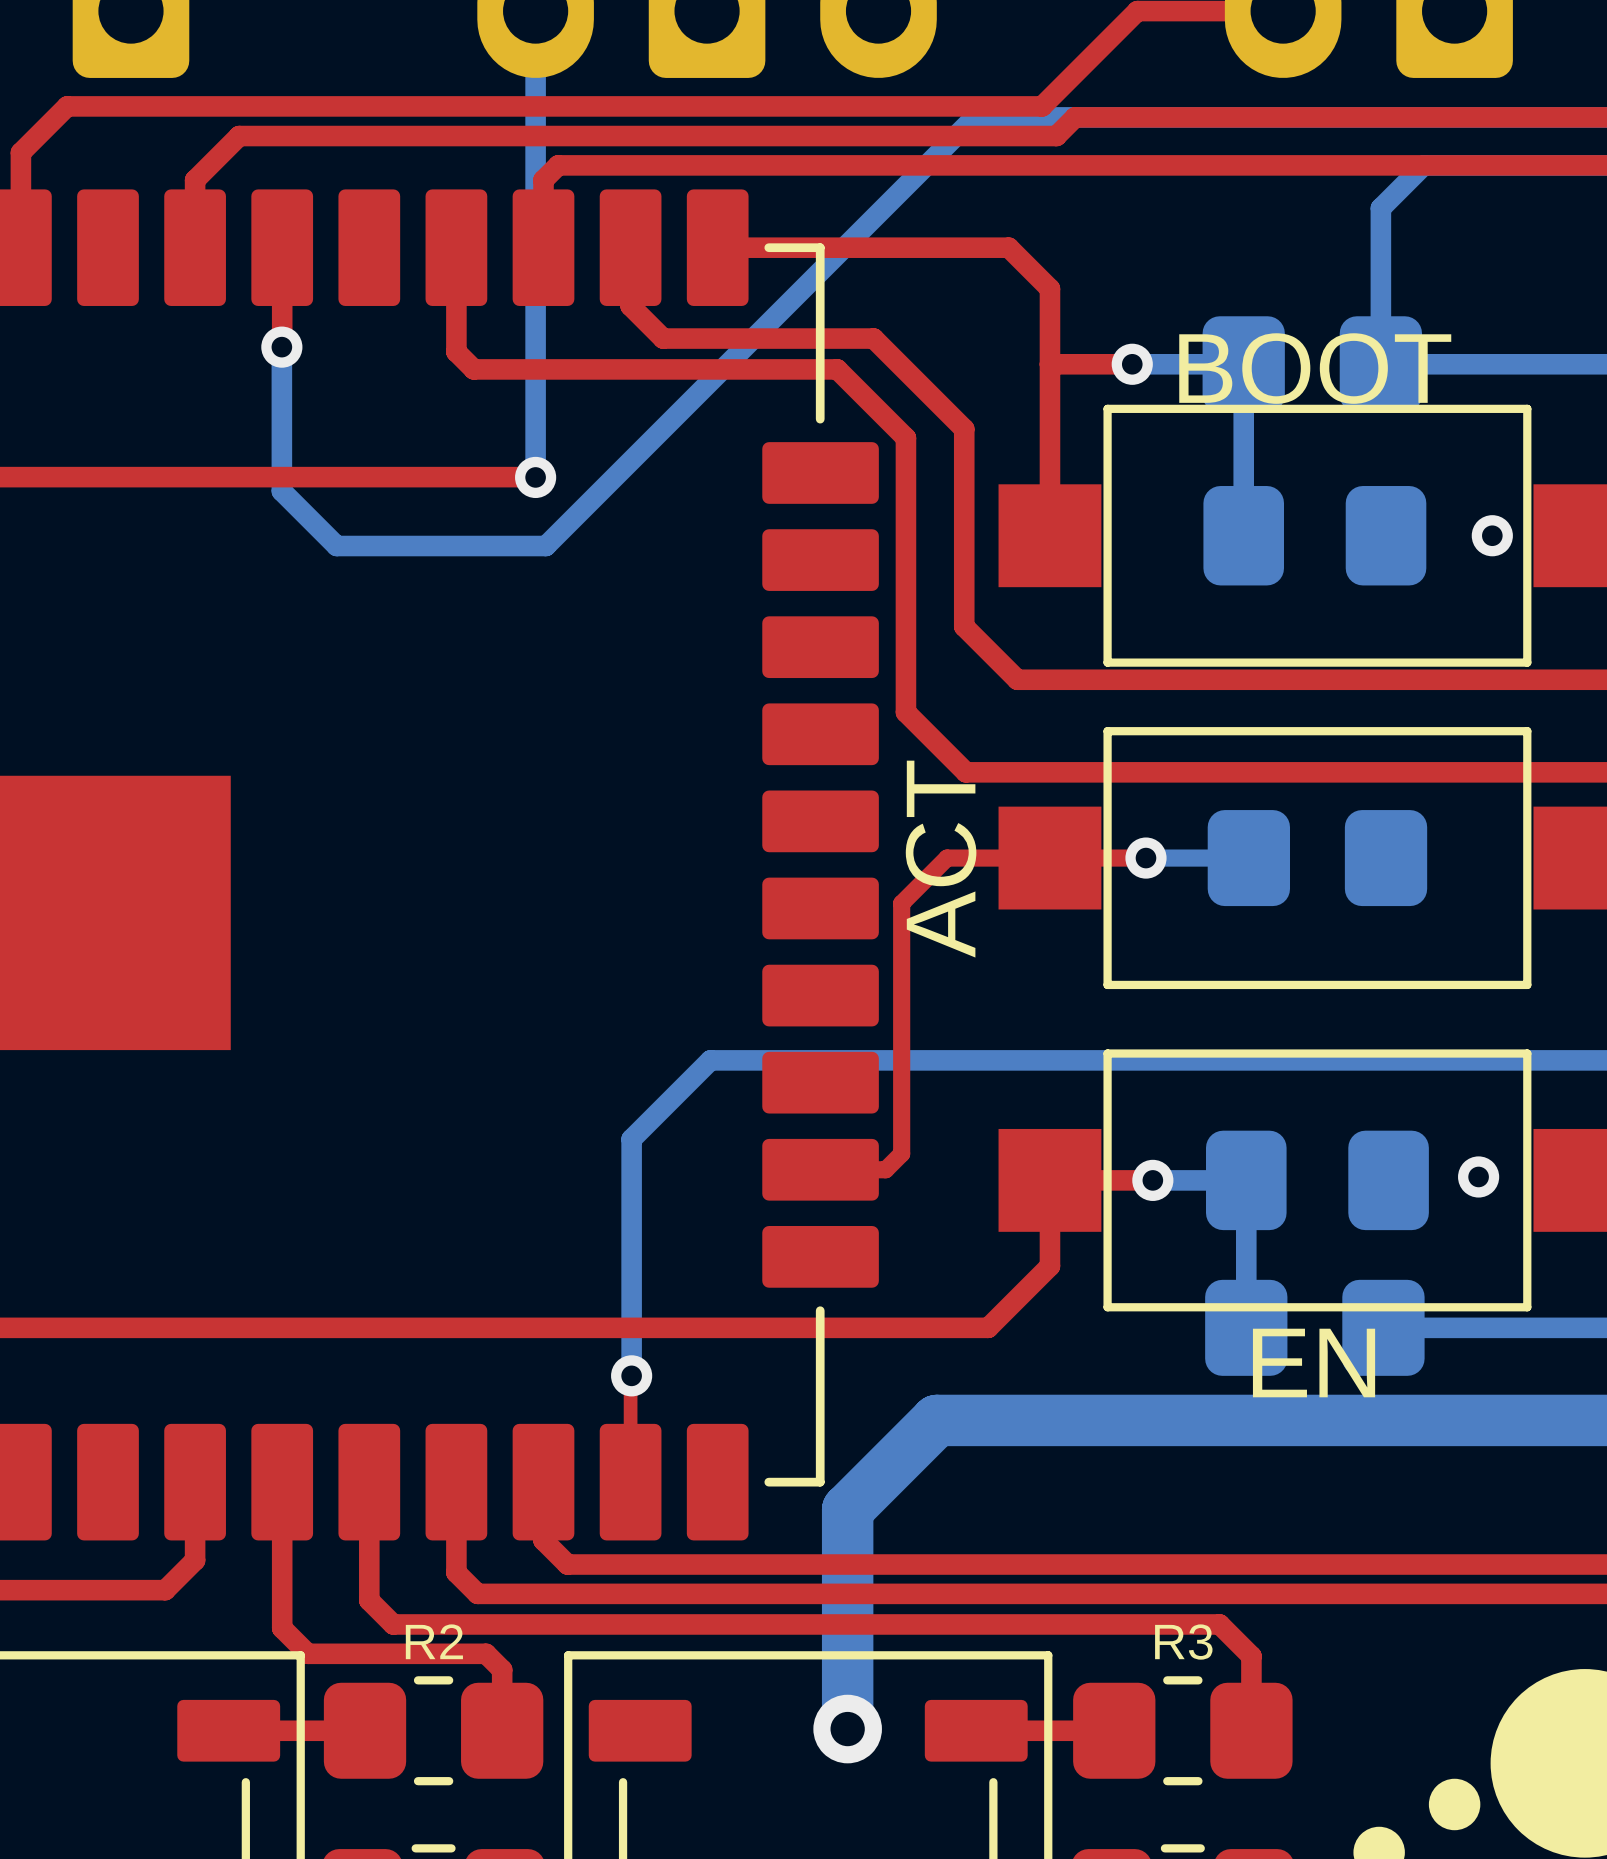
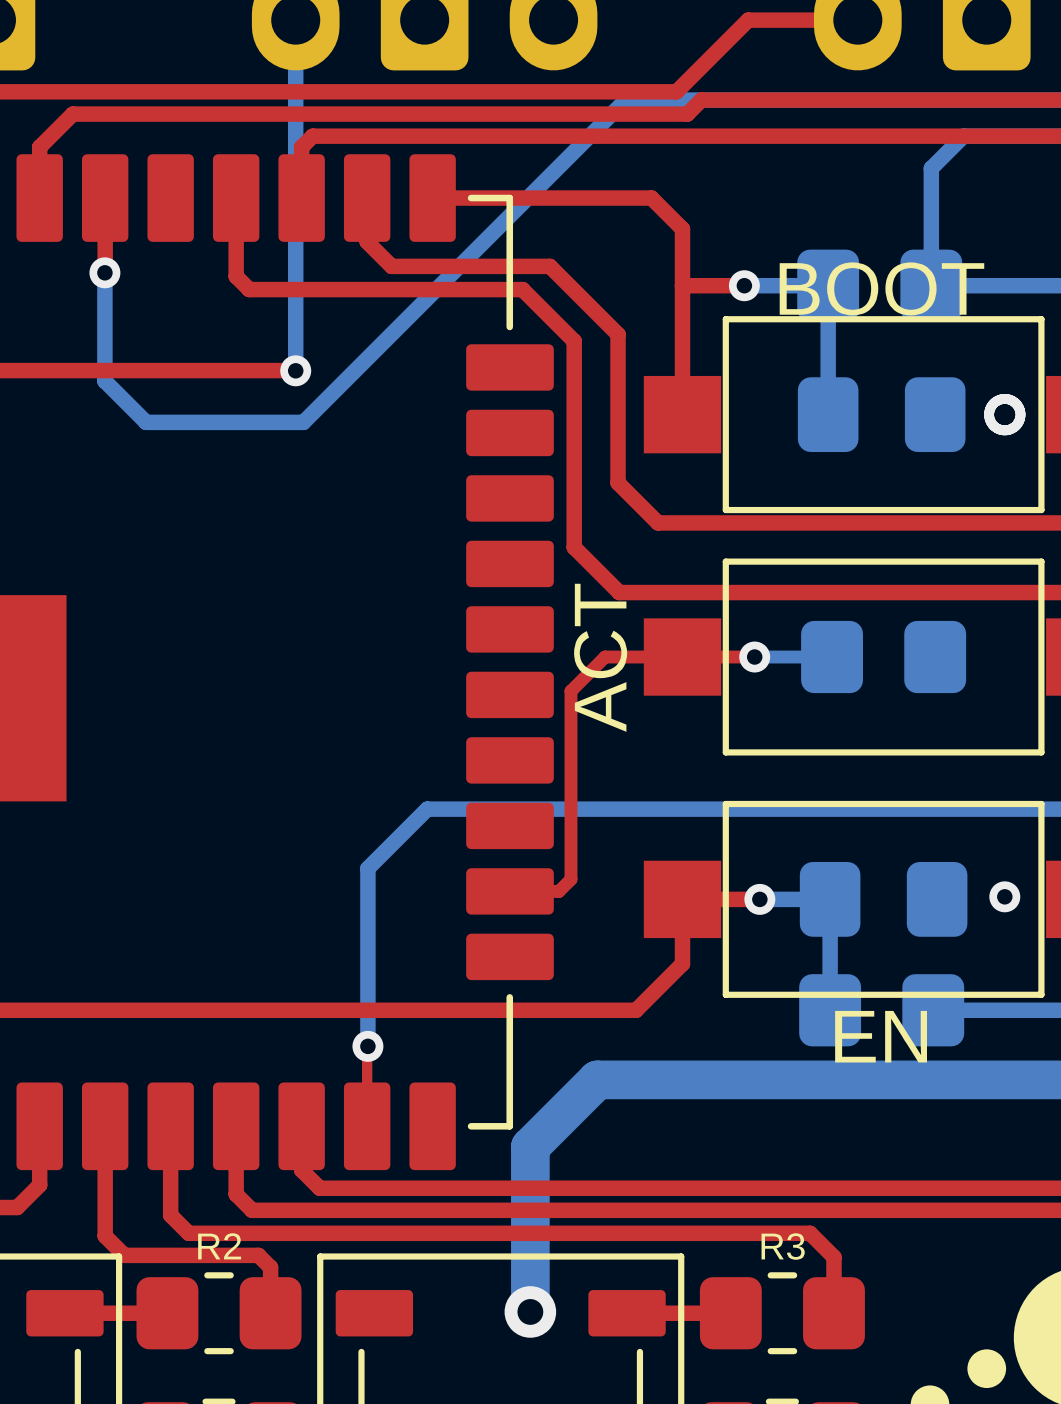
via size: [1471, 515, 1513, 557] -> [984, 394, 1026, 436]

